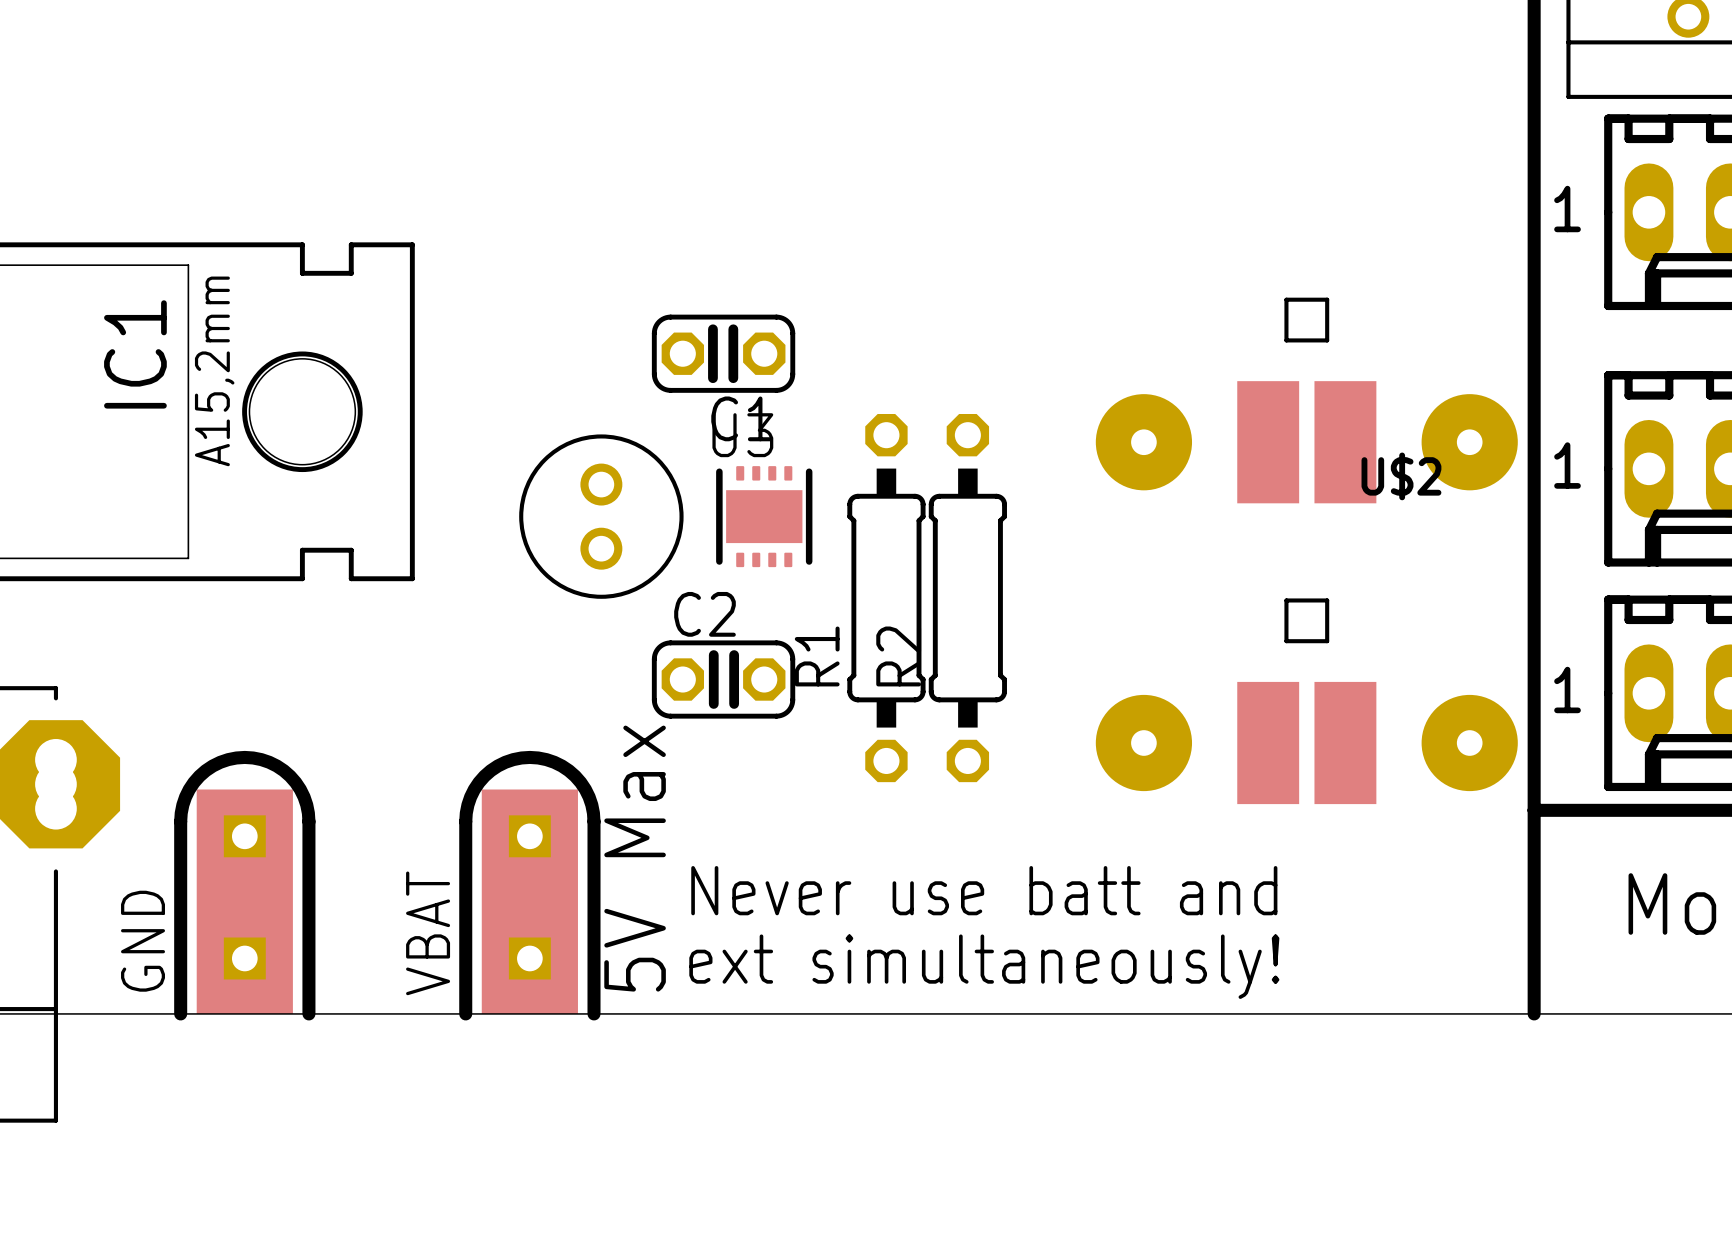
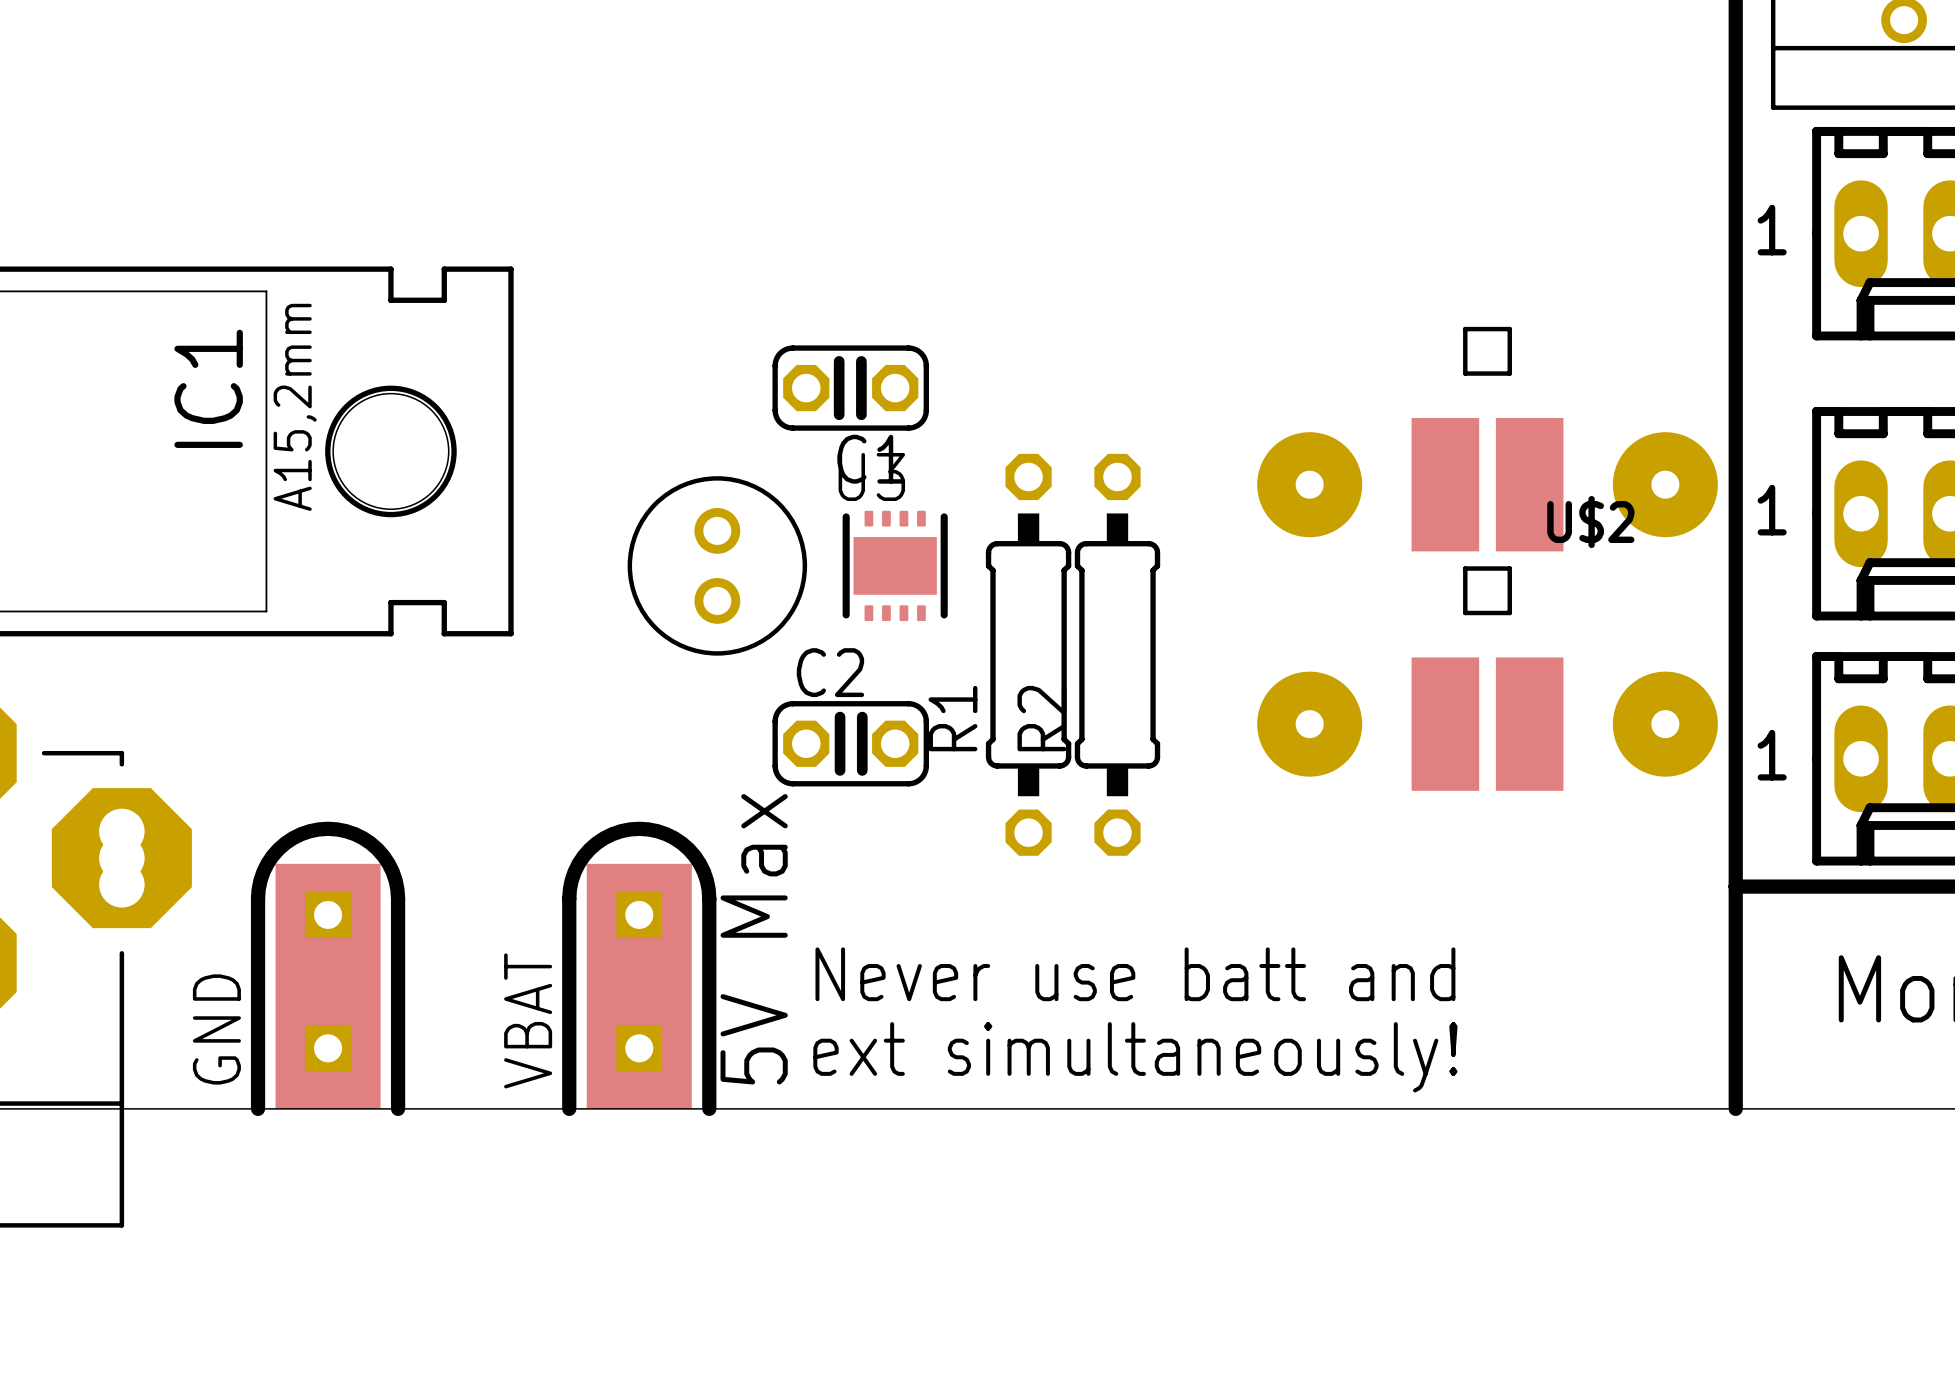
part position: (1306, 701) -> (1487, 678)

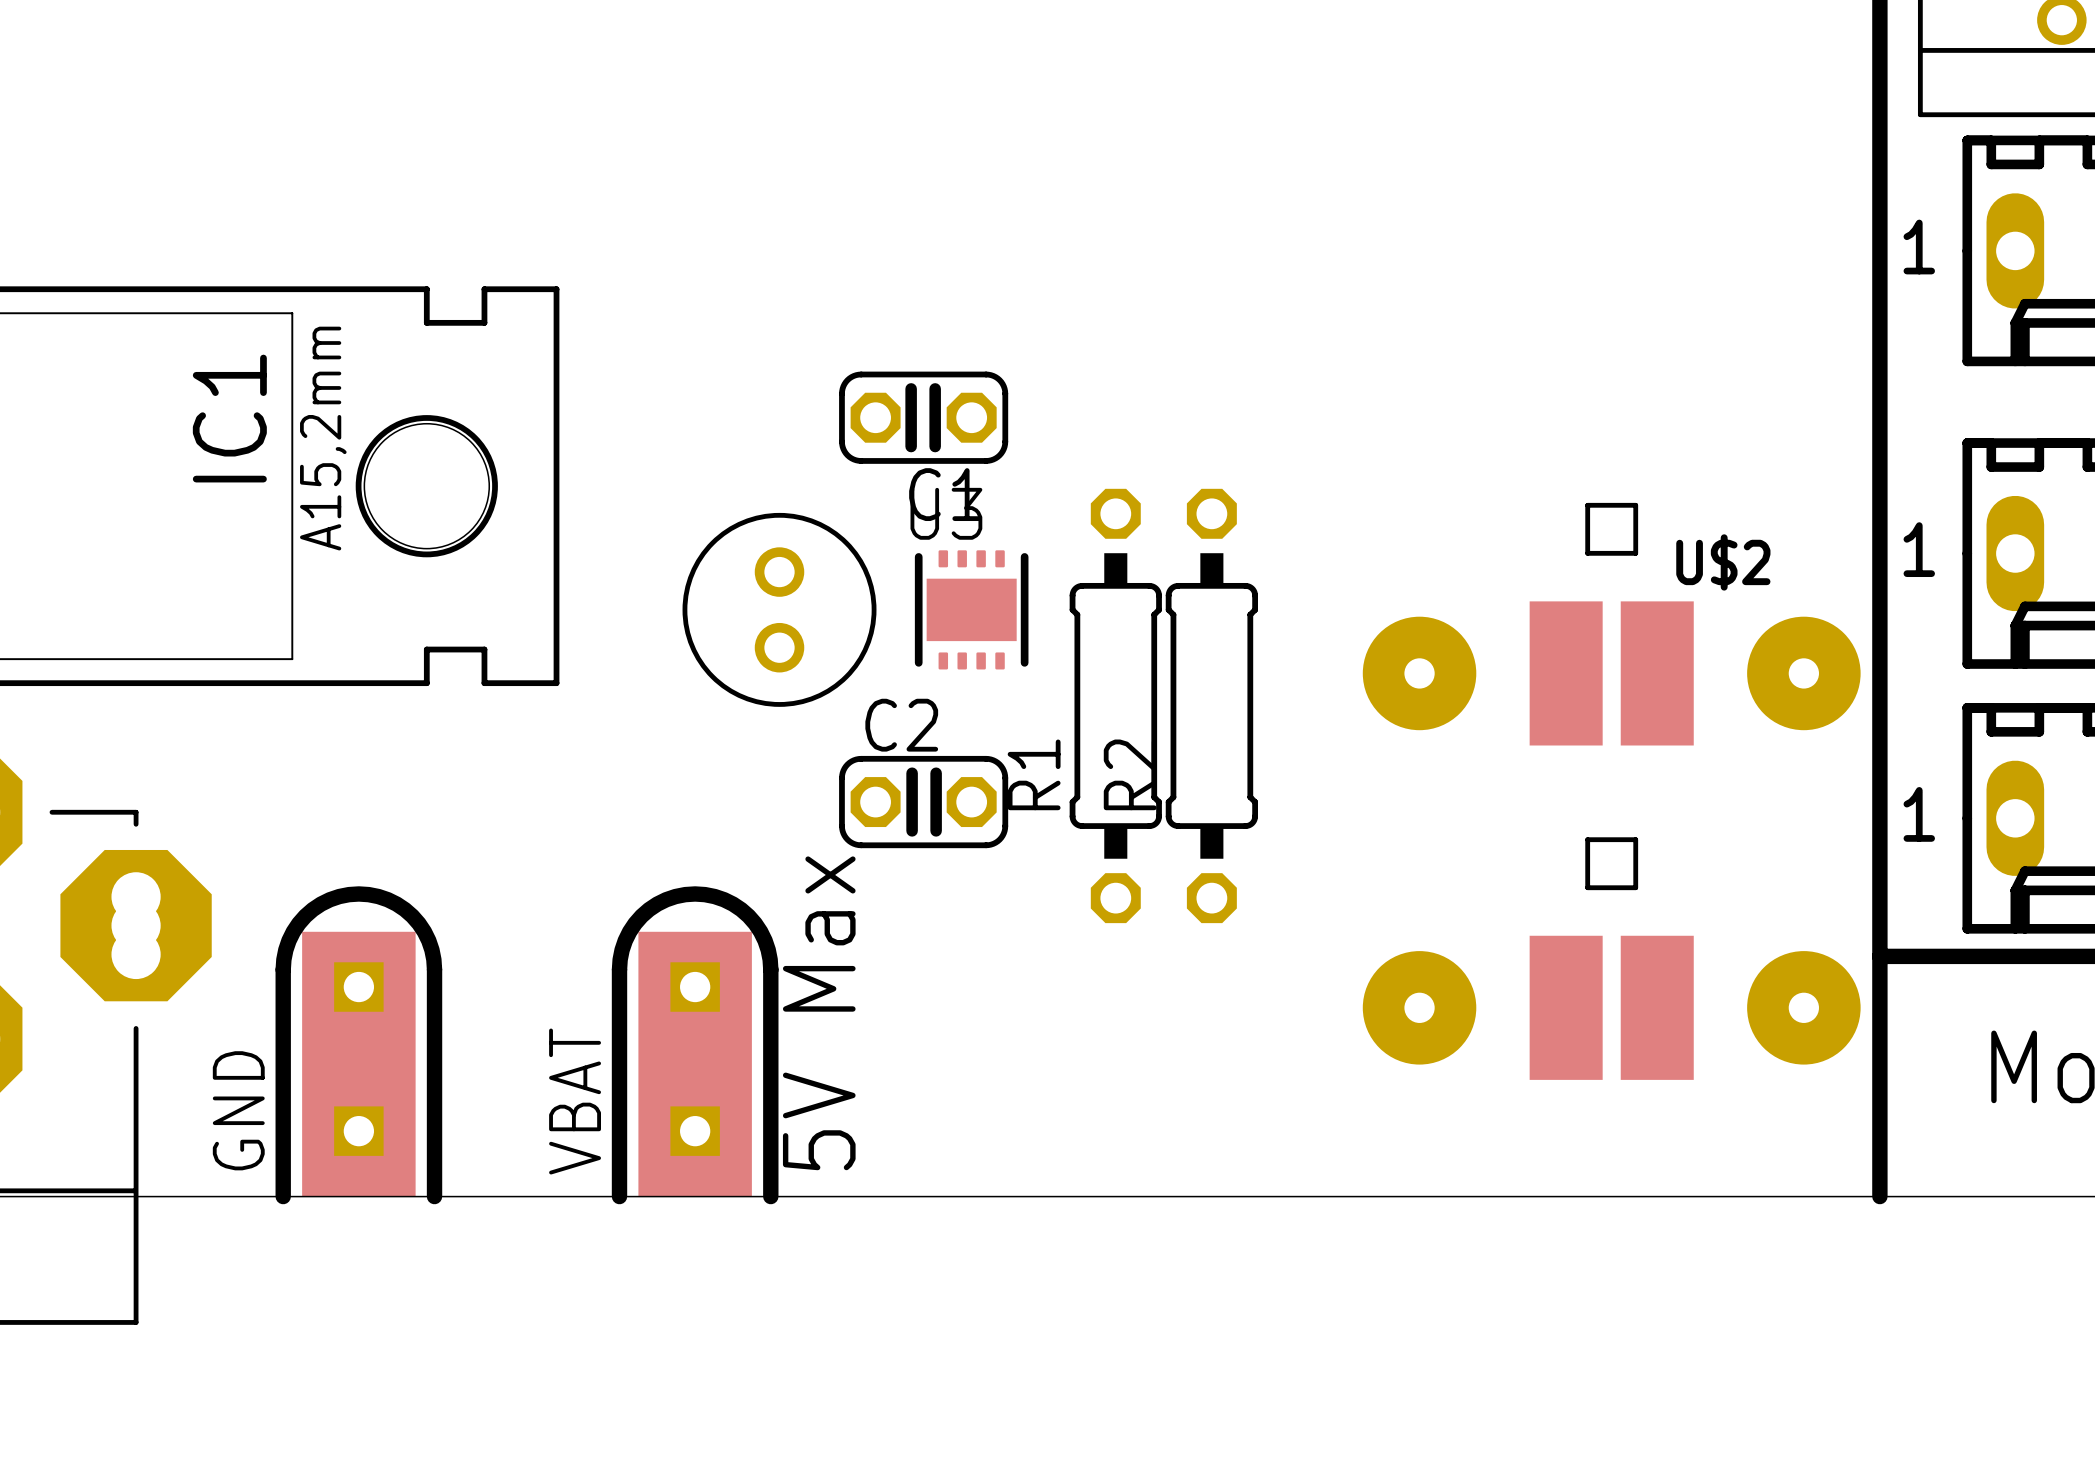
part: (1487, 439) -> none
part: none -> (1611, 624)
part: (1487, 678) -> none
part: none -> (1611, 958)
text: Never use batt and (1135, 974) -> none
text: ext simultaneously! (1135, 1057) -> none

